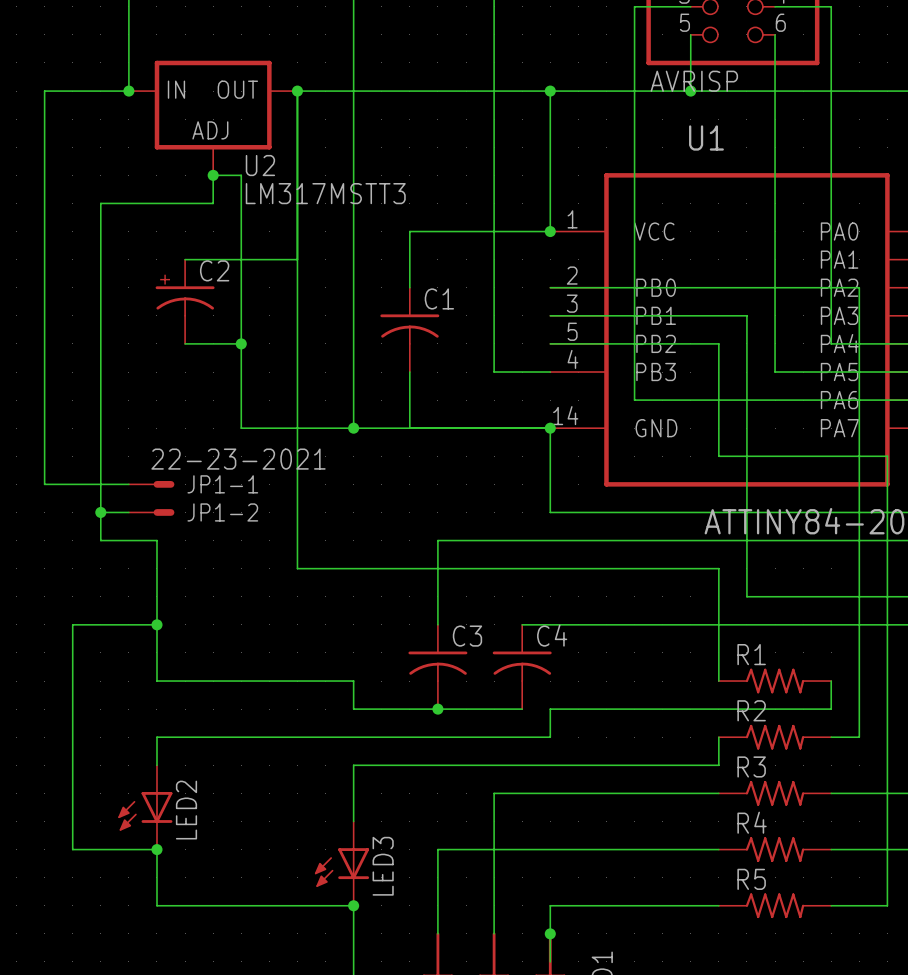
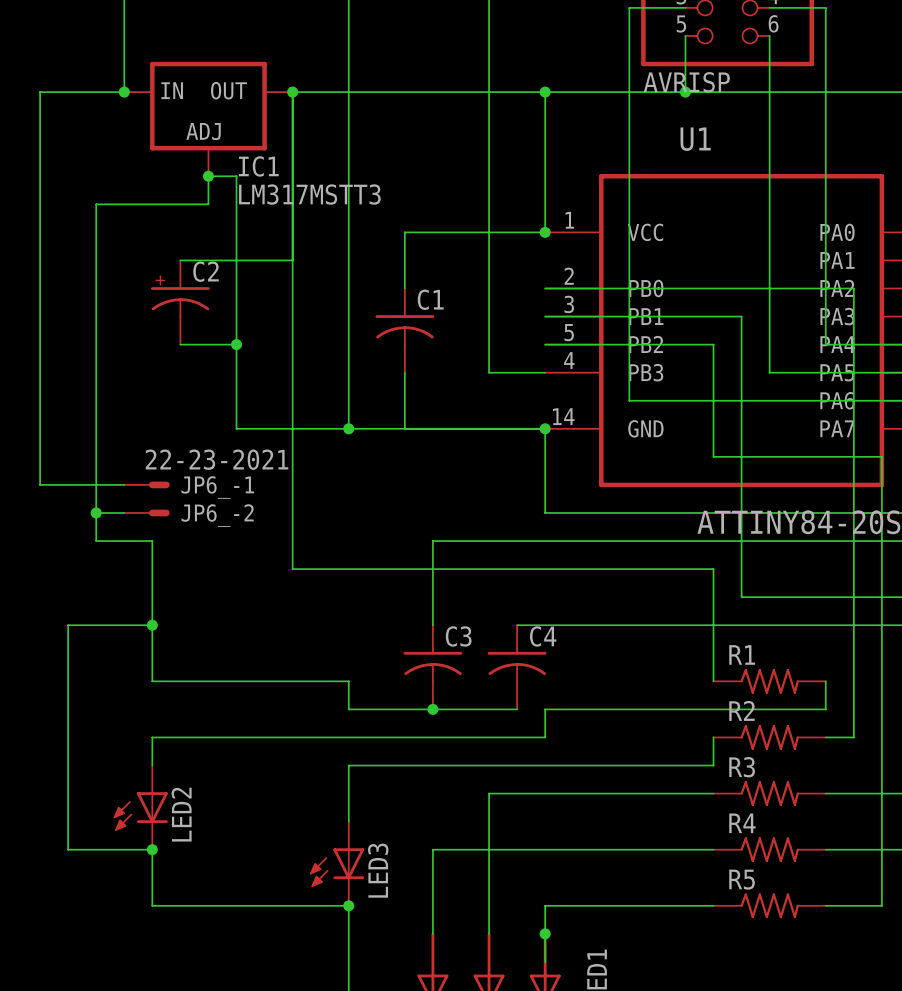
U2 name: U2 (260, 165) -> IC1 (258, 166)
JP1-1 name: JP1-1 (222, 484) -> JP6_-1 (217, 487)
JP1-2 name: JP1-2 (222, 512) -> JP6_-2 (217, 515)

